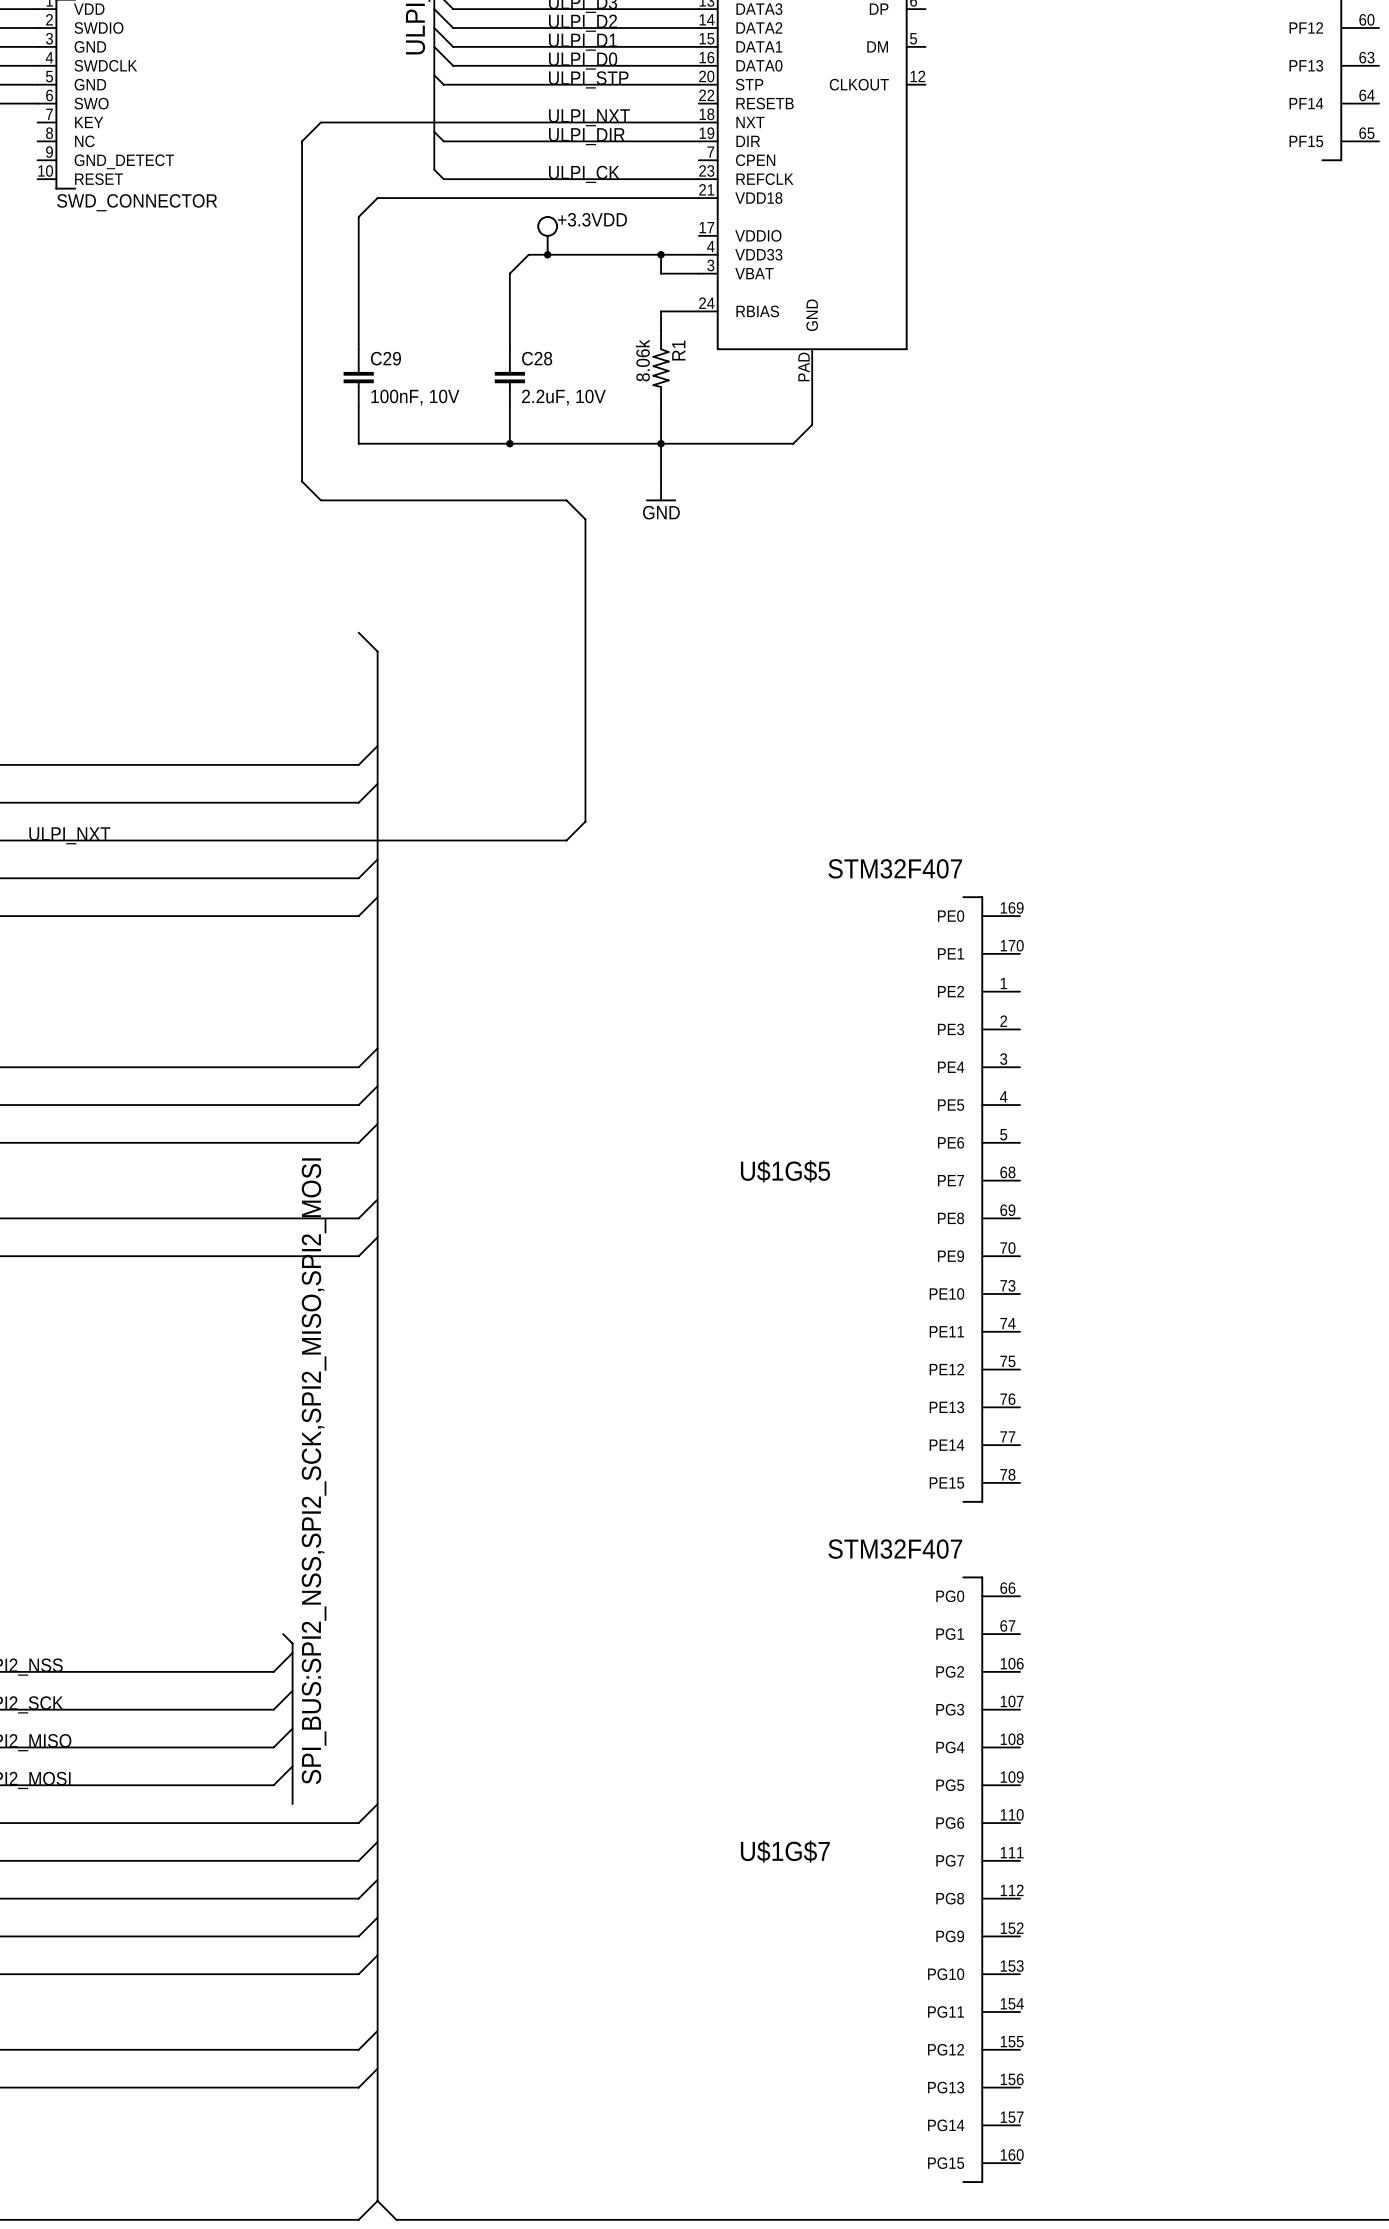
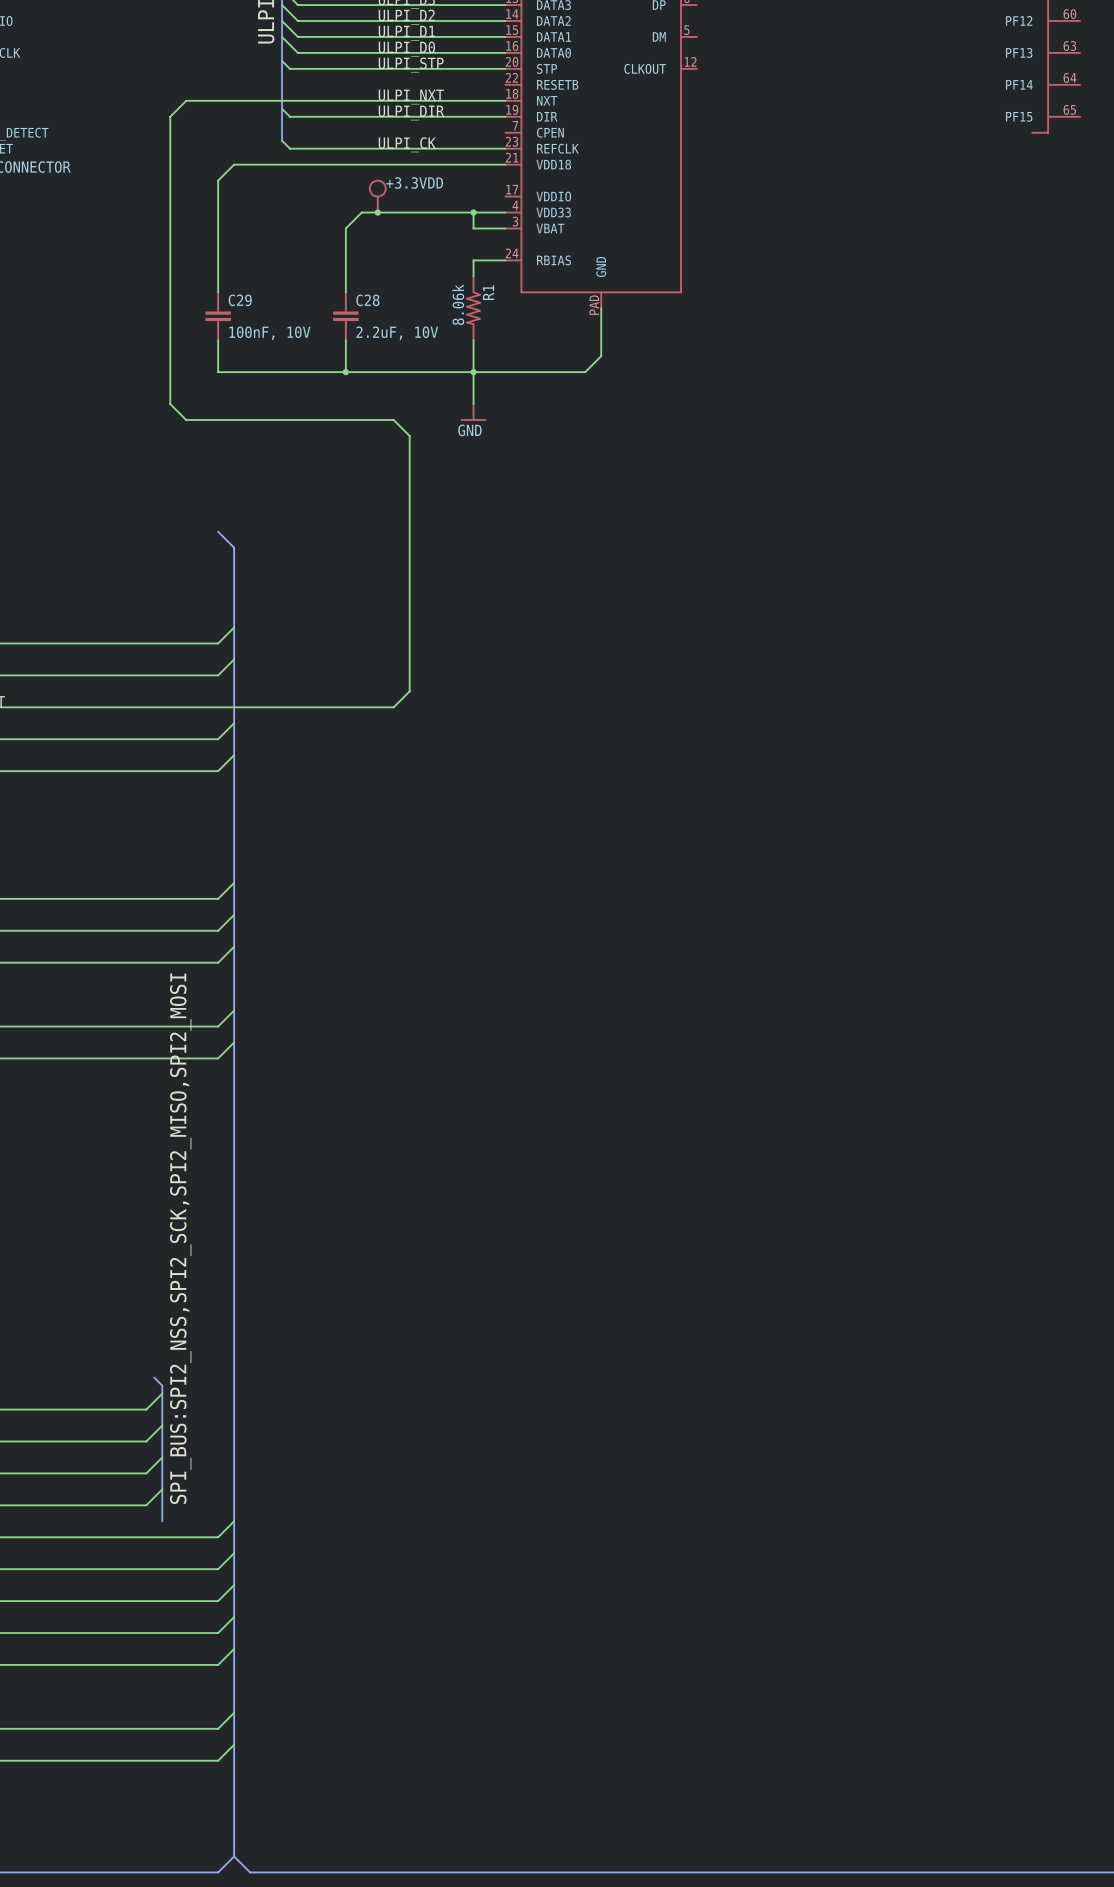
U$1G$5: STM32F407 (991, 1199) -> none
U$1G$7: STM32F407 (991, 1879) -> none

